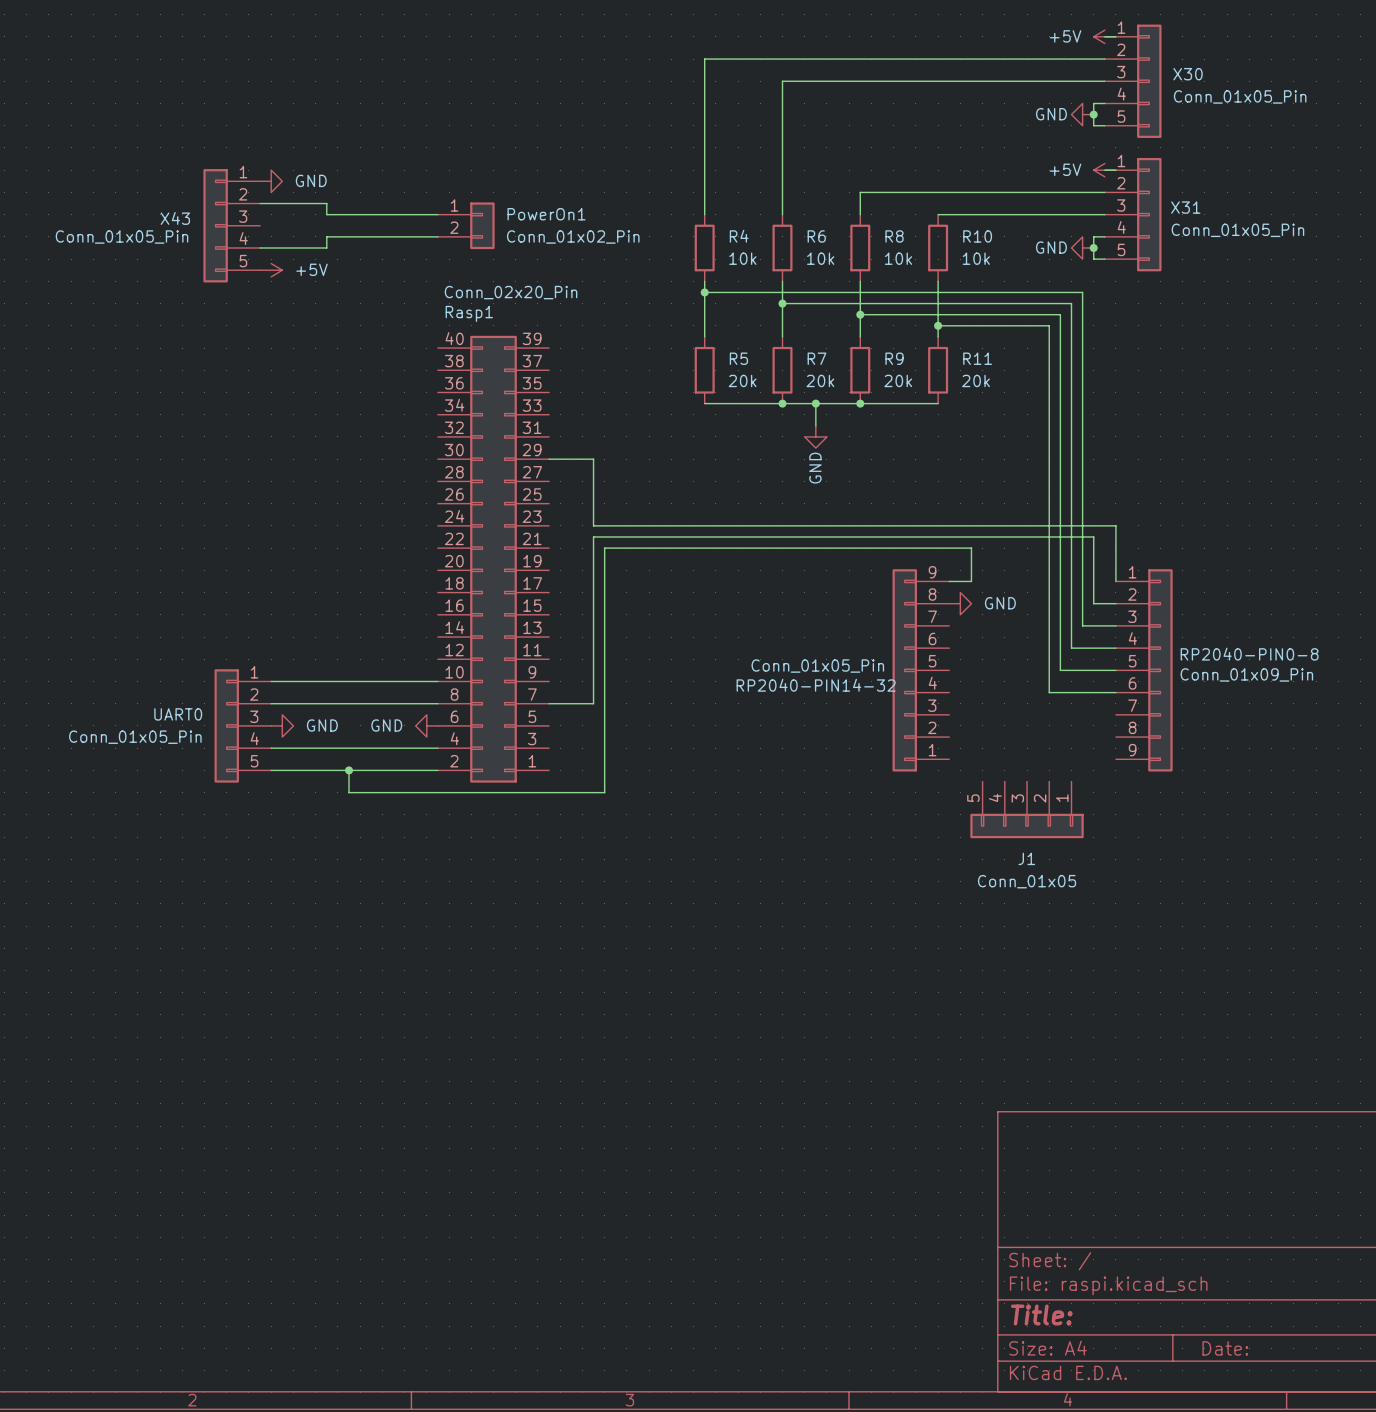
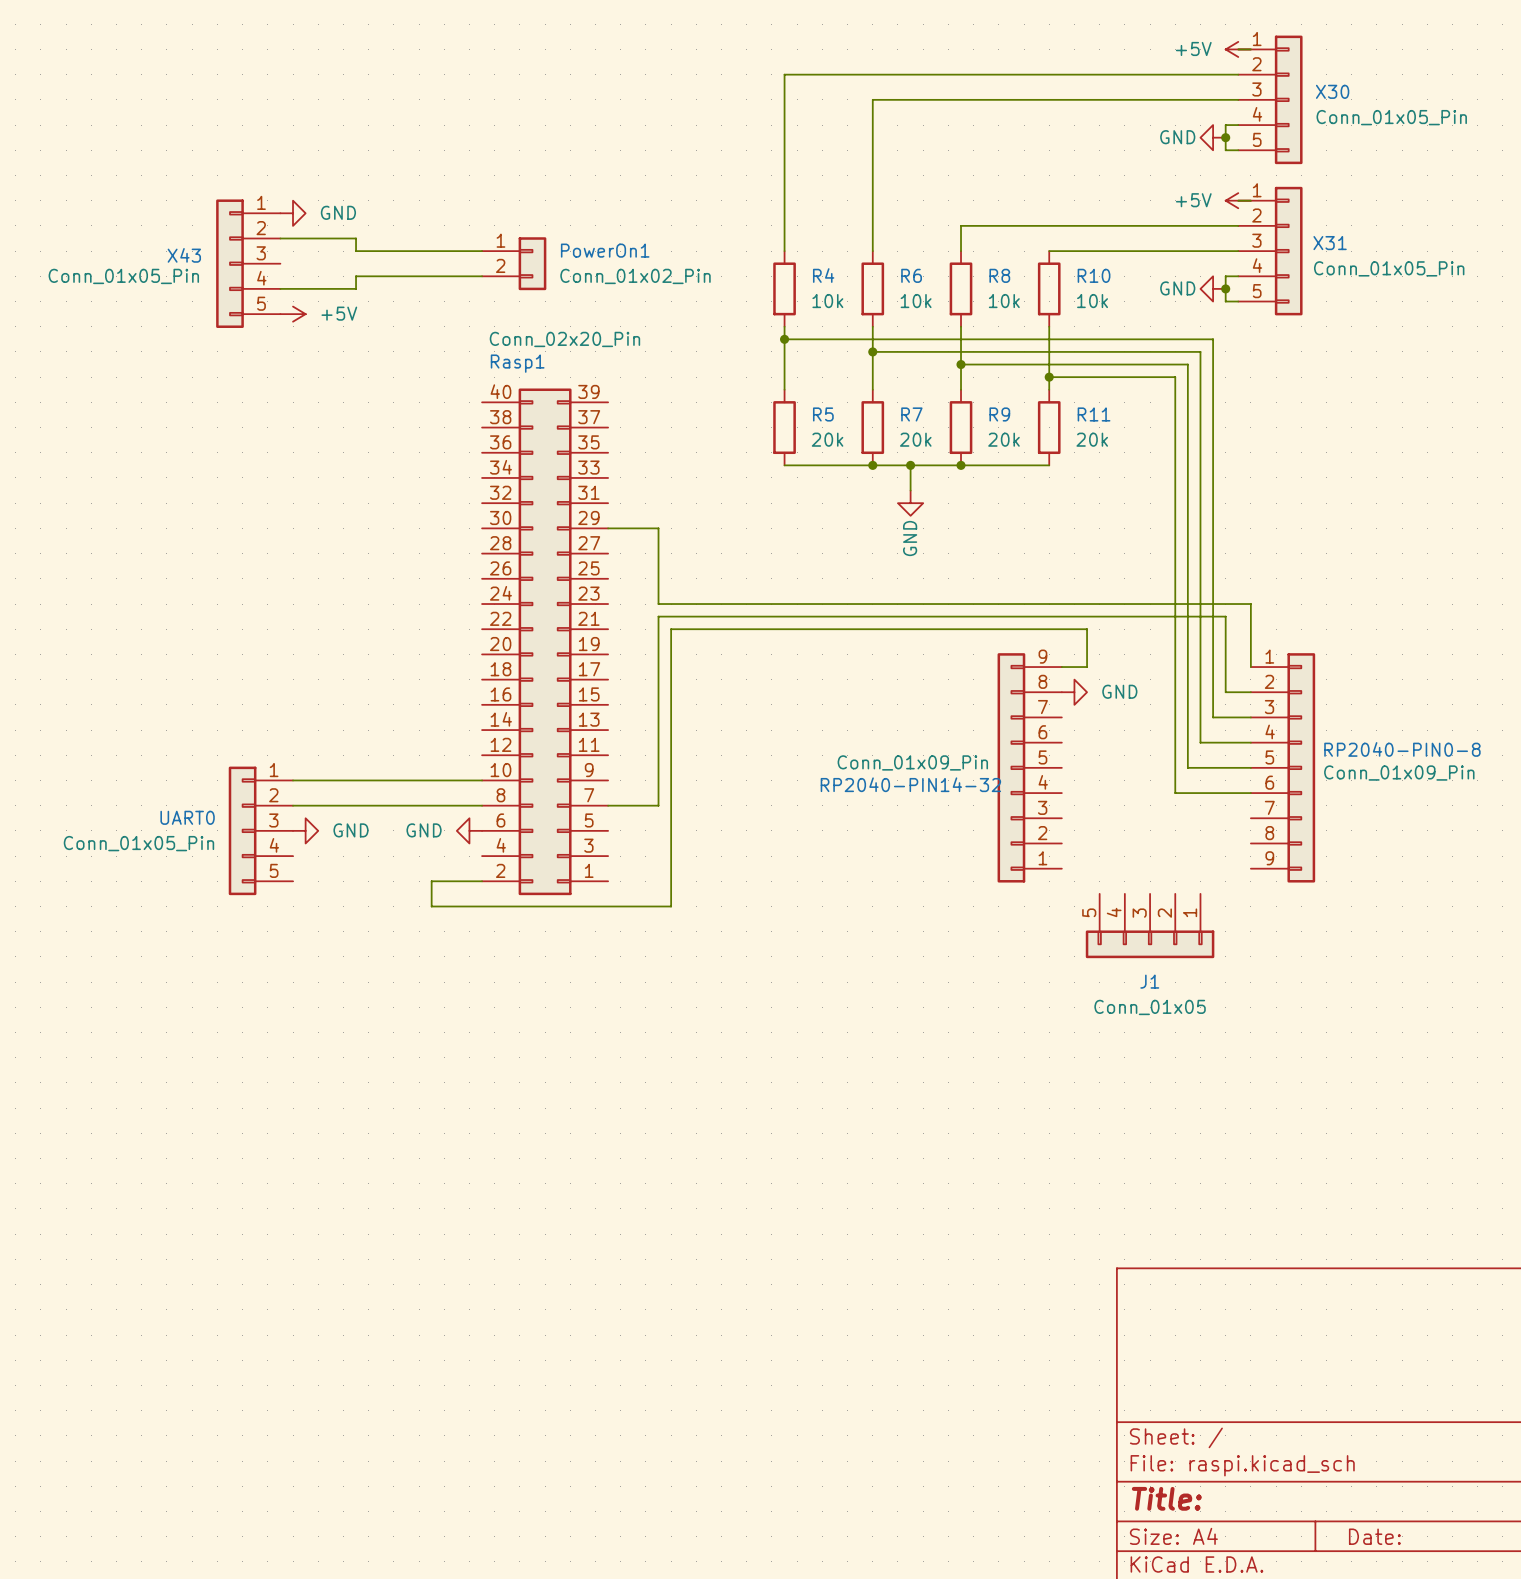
RP2040-PIN14-32 value: Conn_01x05_Pin (817, 666) -> Conn_01x09_Pin (912, 762)
wire: (271, 748) (437, 748) -> none
wire: (271, 770) (393, 770) -> none
wire: (349, 770) (349, 792) (393, 792) -> (431, 881) (431, 906)
junction: (349, 770) -> none

